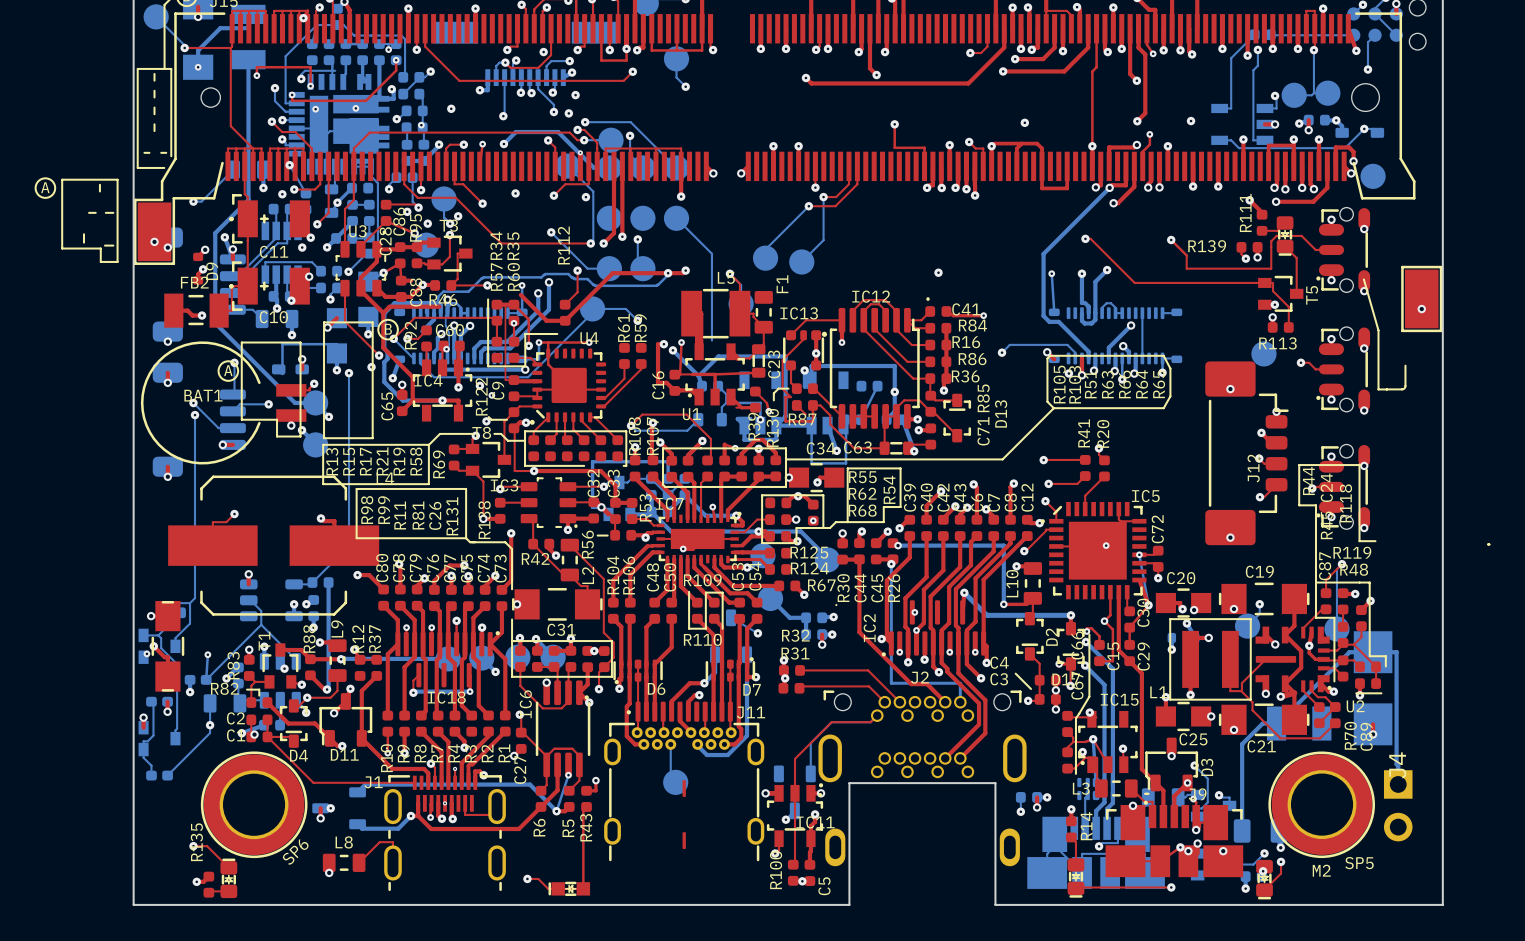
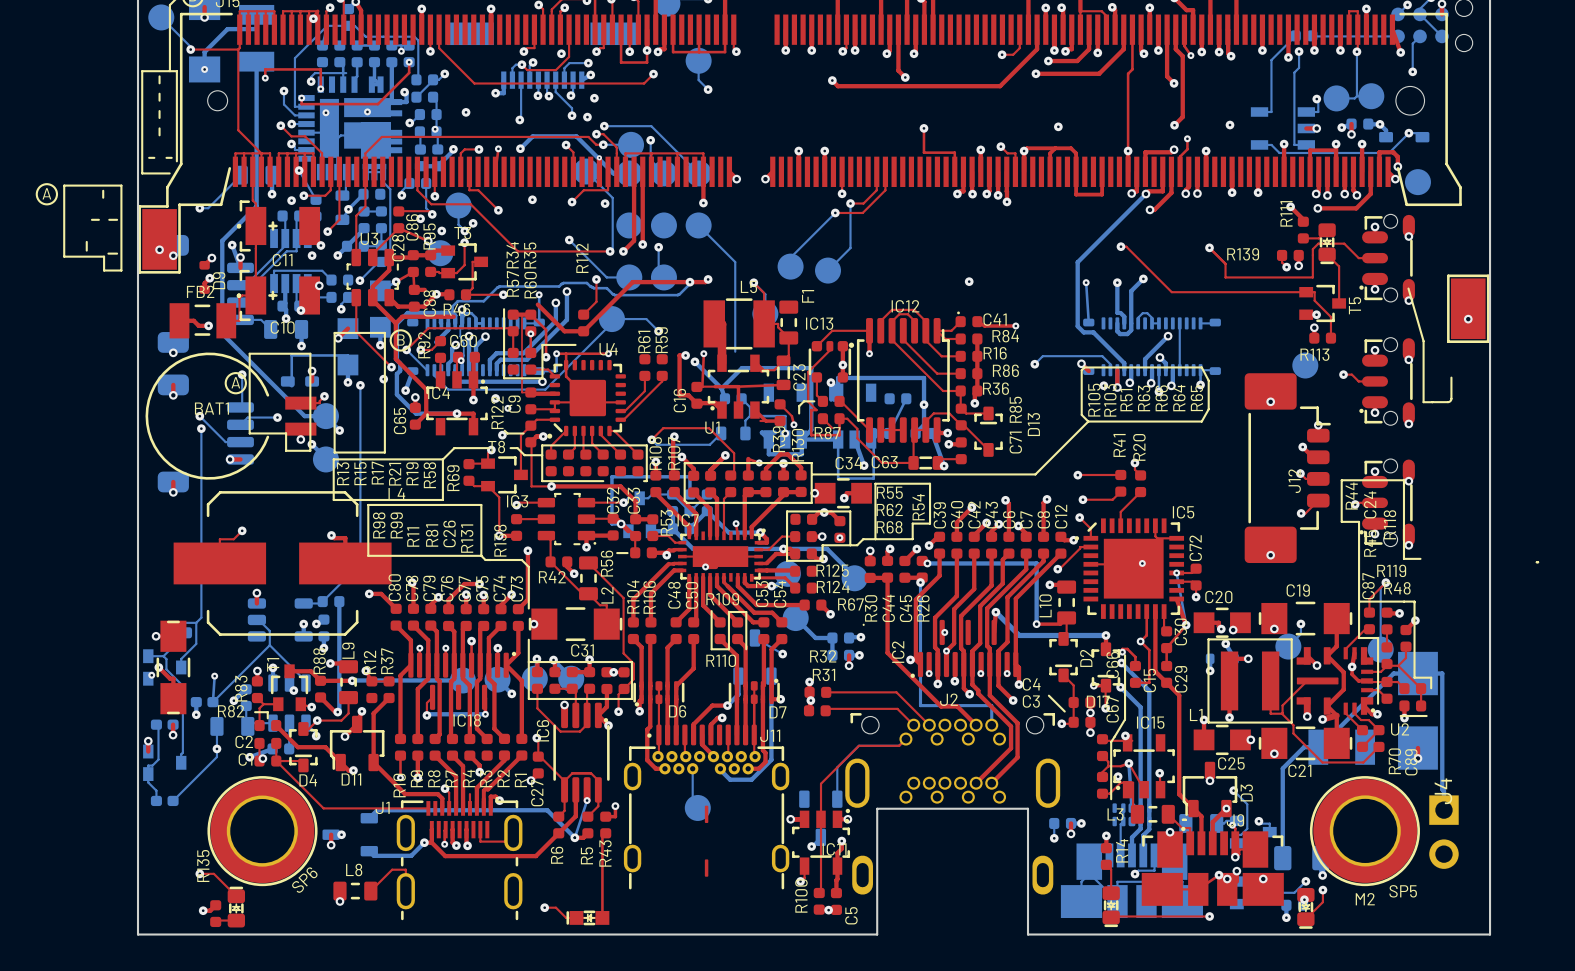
via: (455, 768) -> none
via: (445, 803) -> none

